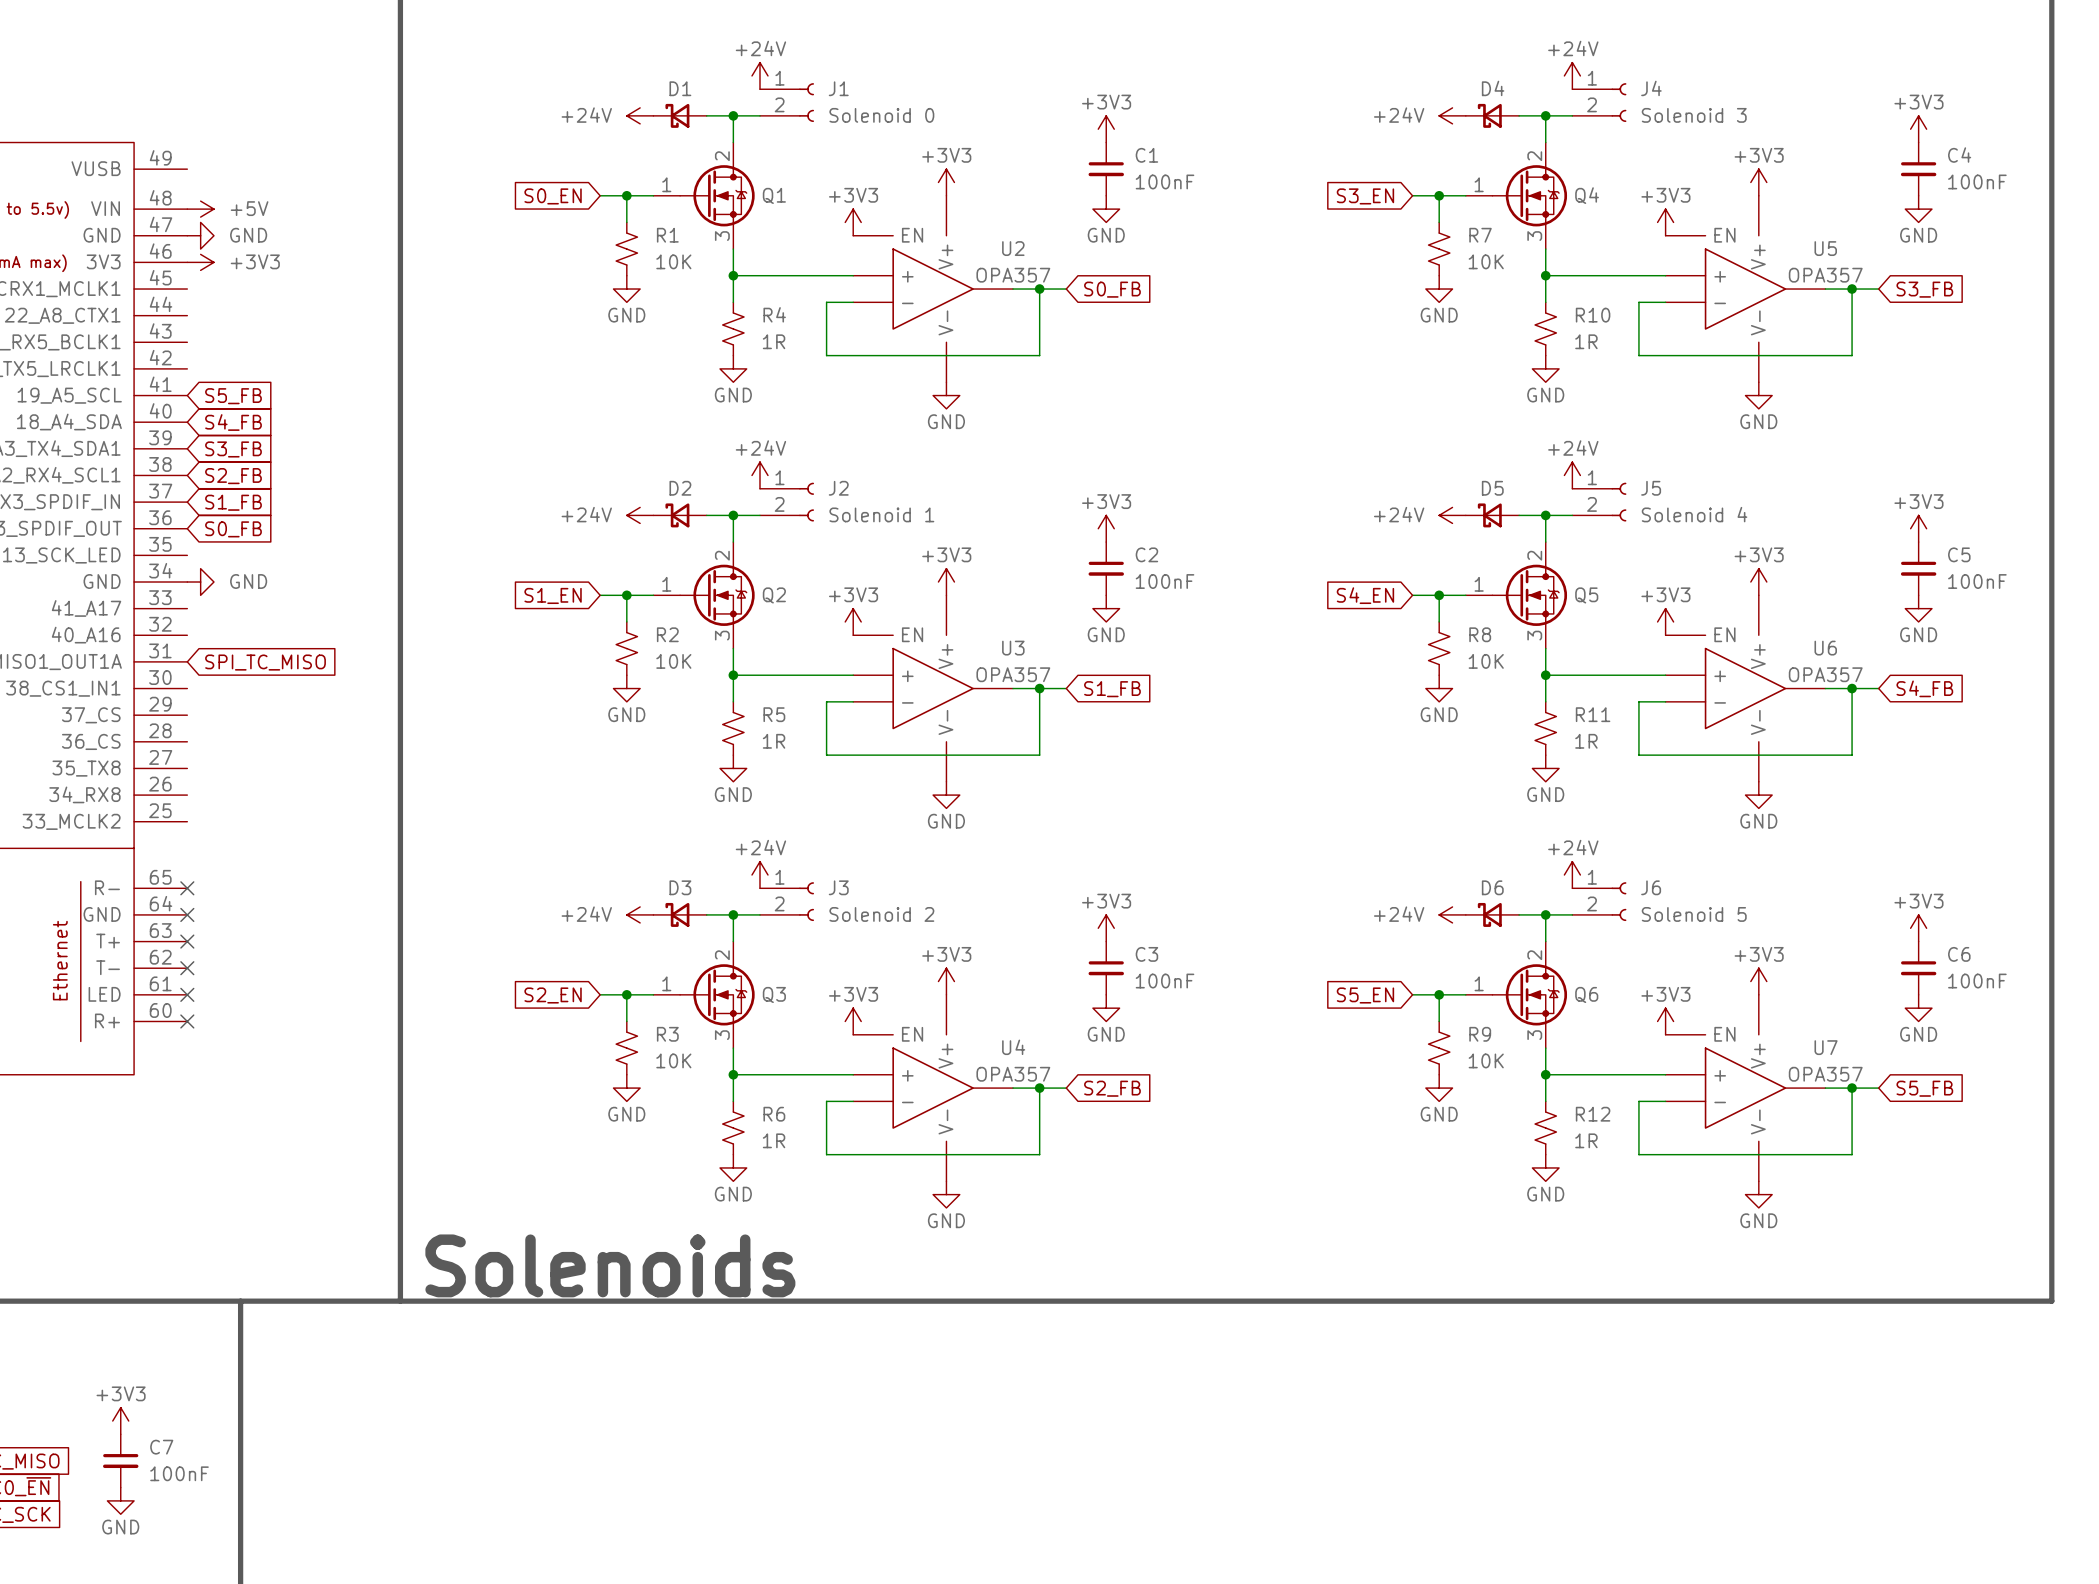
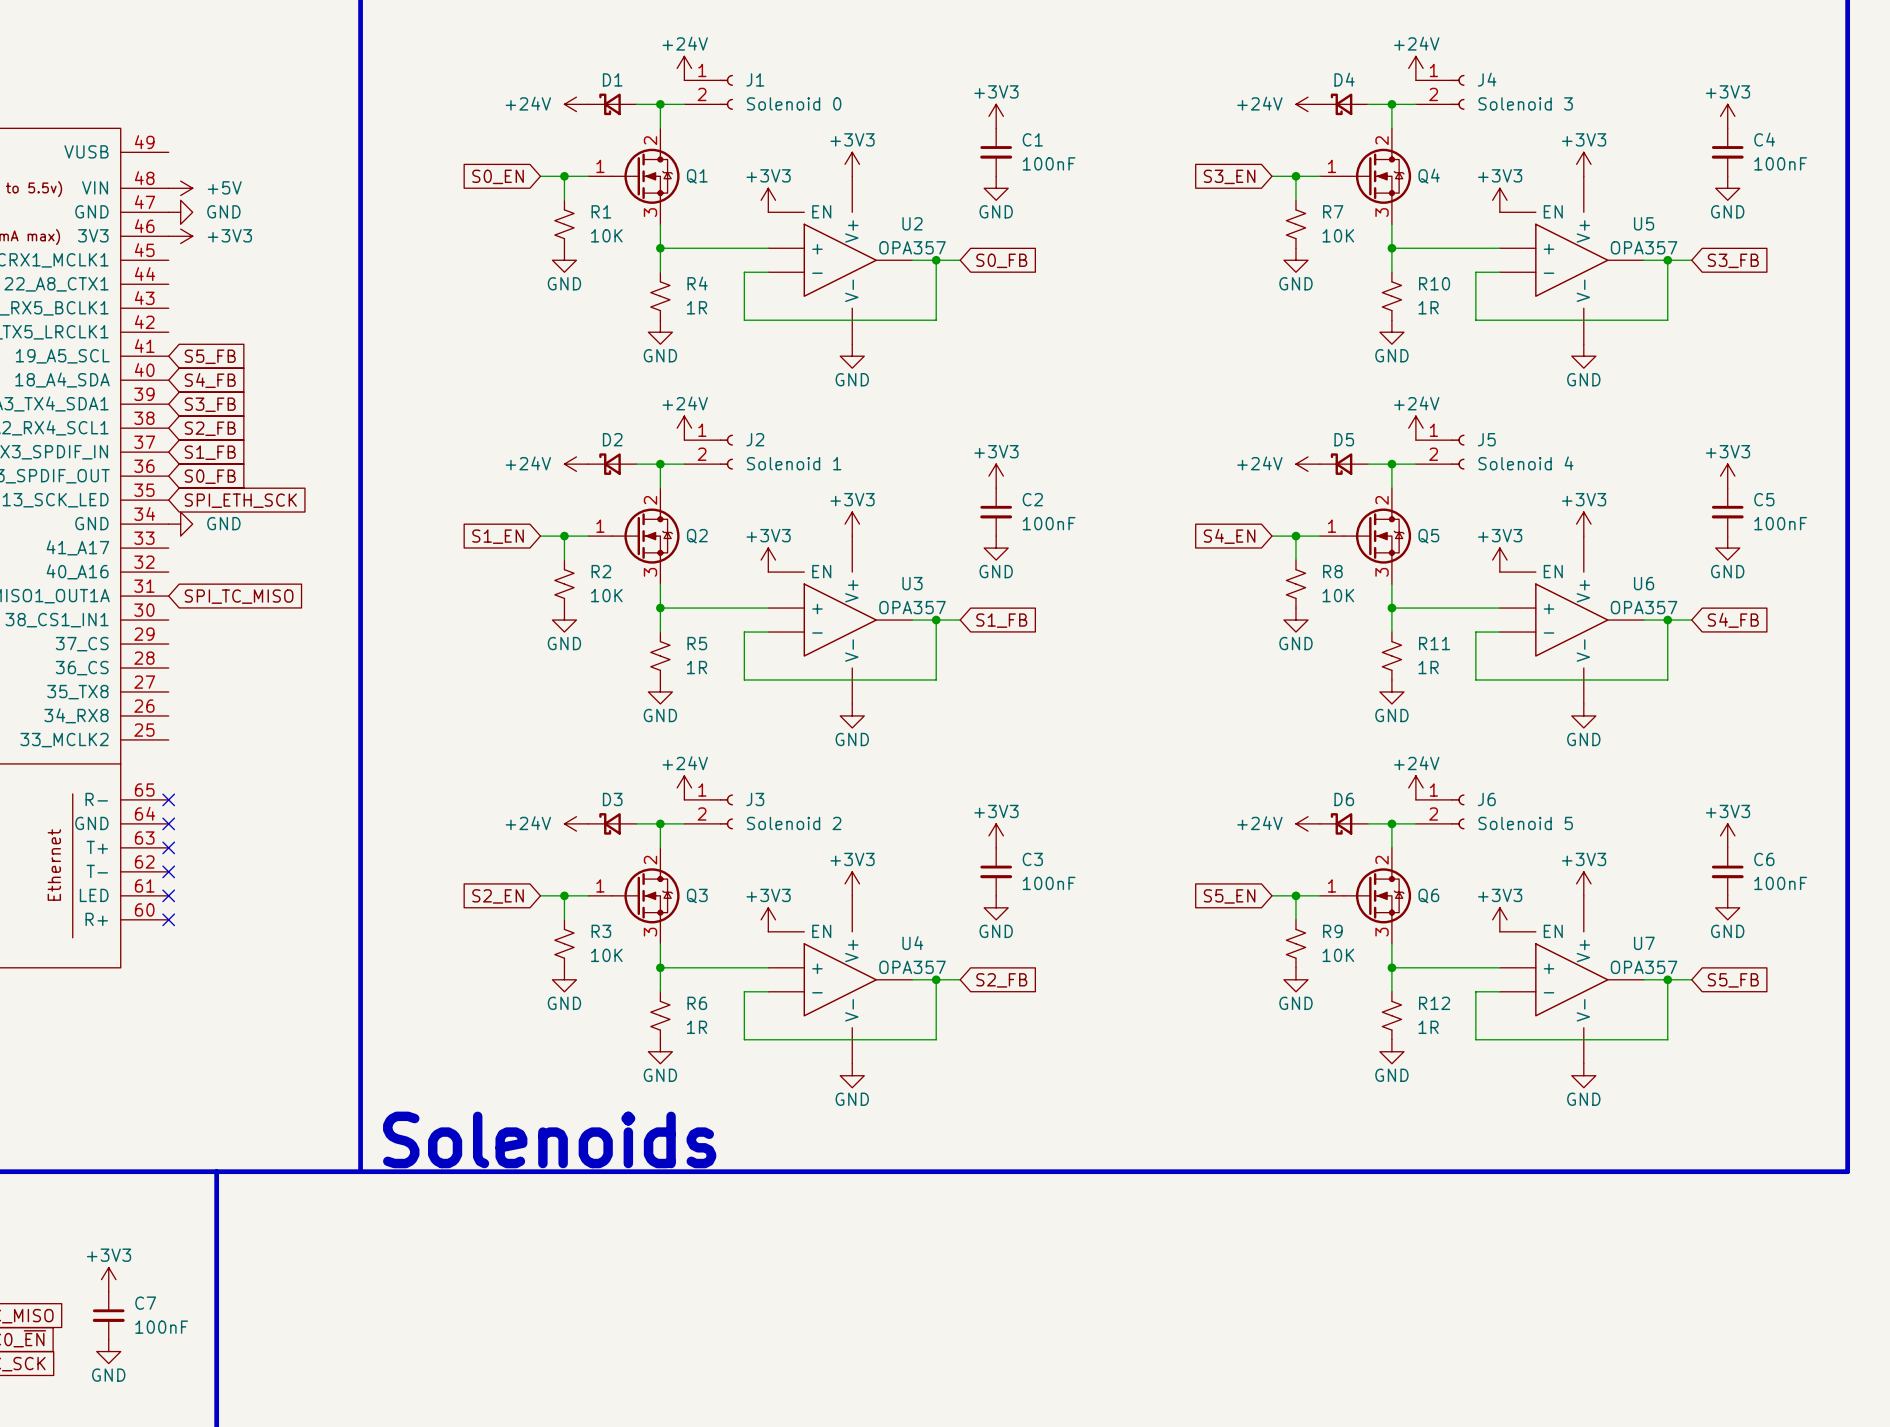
global label: none -> SPI_ETH_SCK (240, 500)

